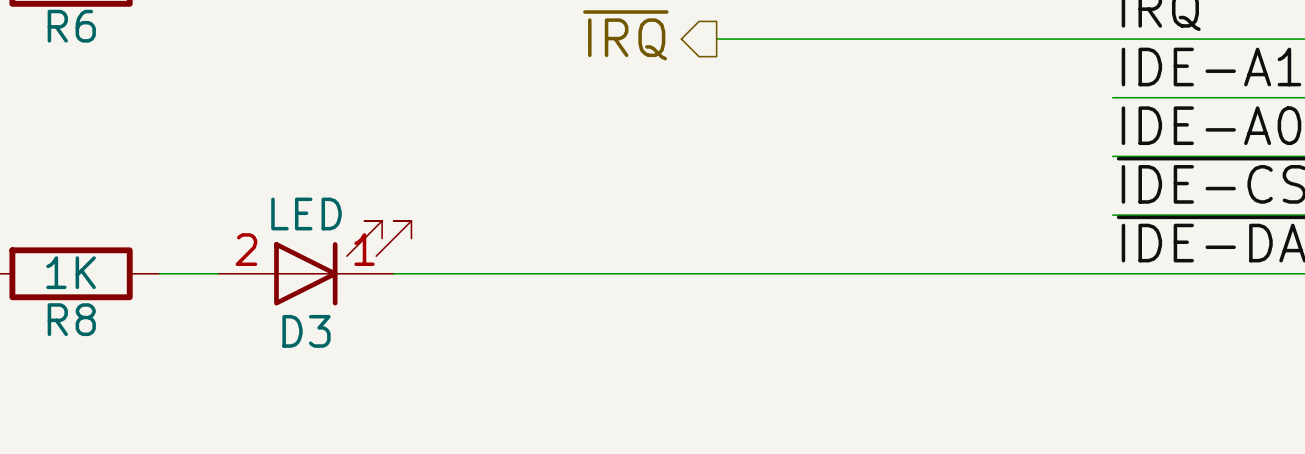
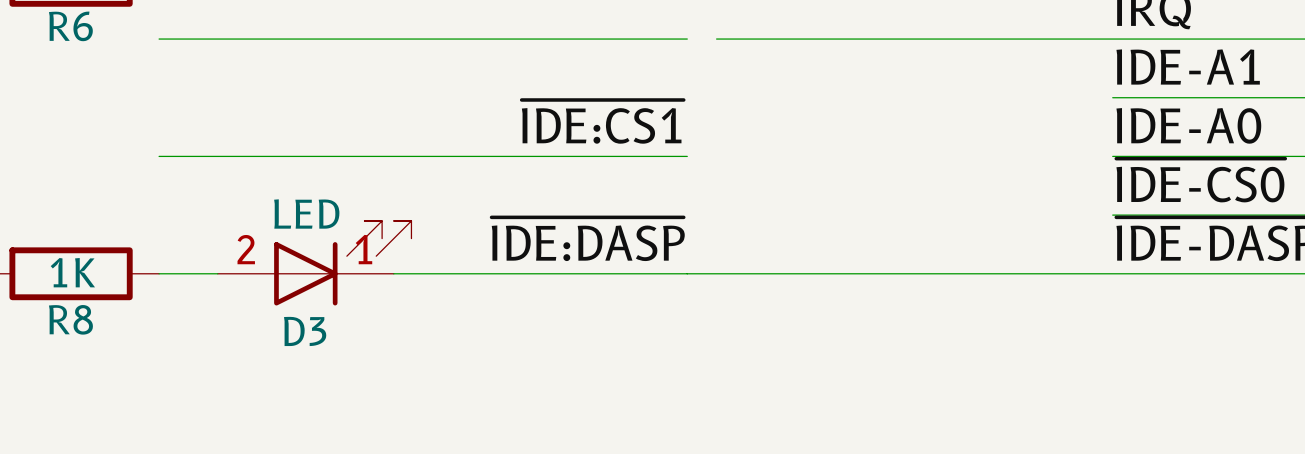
hierarchical label: ~{IRQ} (625, 35) -> none
wire: none -> (159, 39) (687, 39)
label: none -> ~{IDE:CS1} (602, 121)
wire: none -> (159, 156) (687, 156)
label: none -> ~{IDE:DASP} (588, 239)

